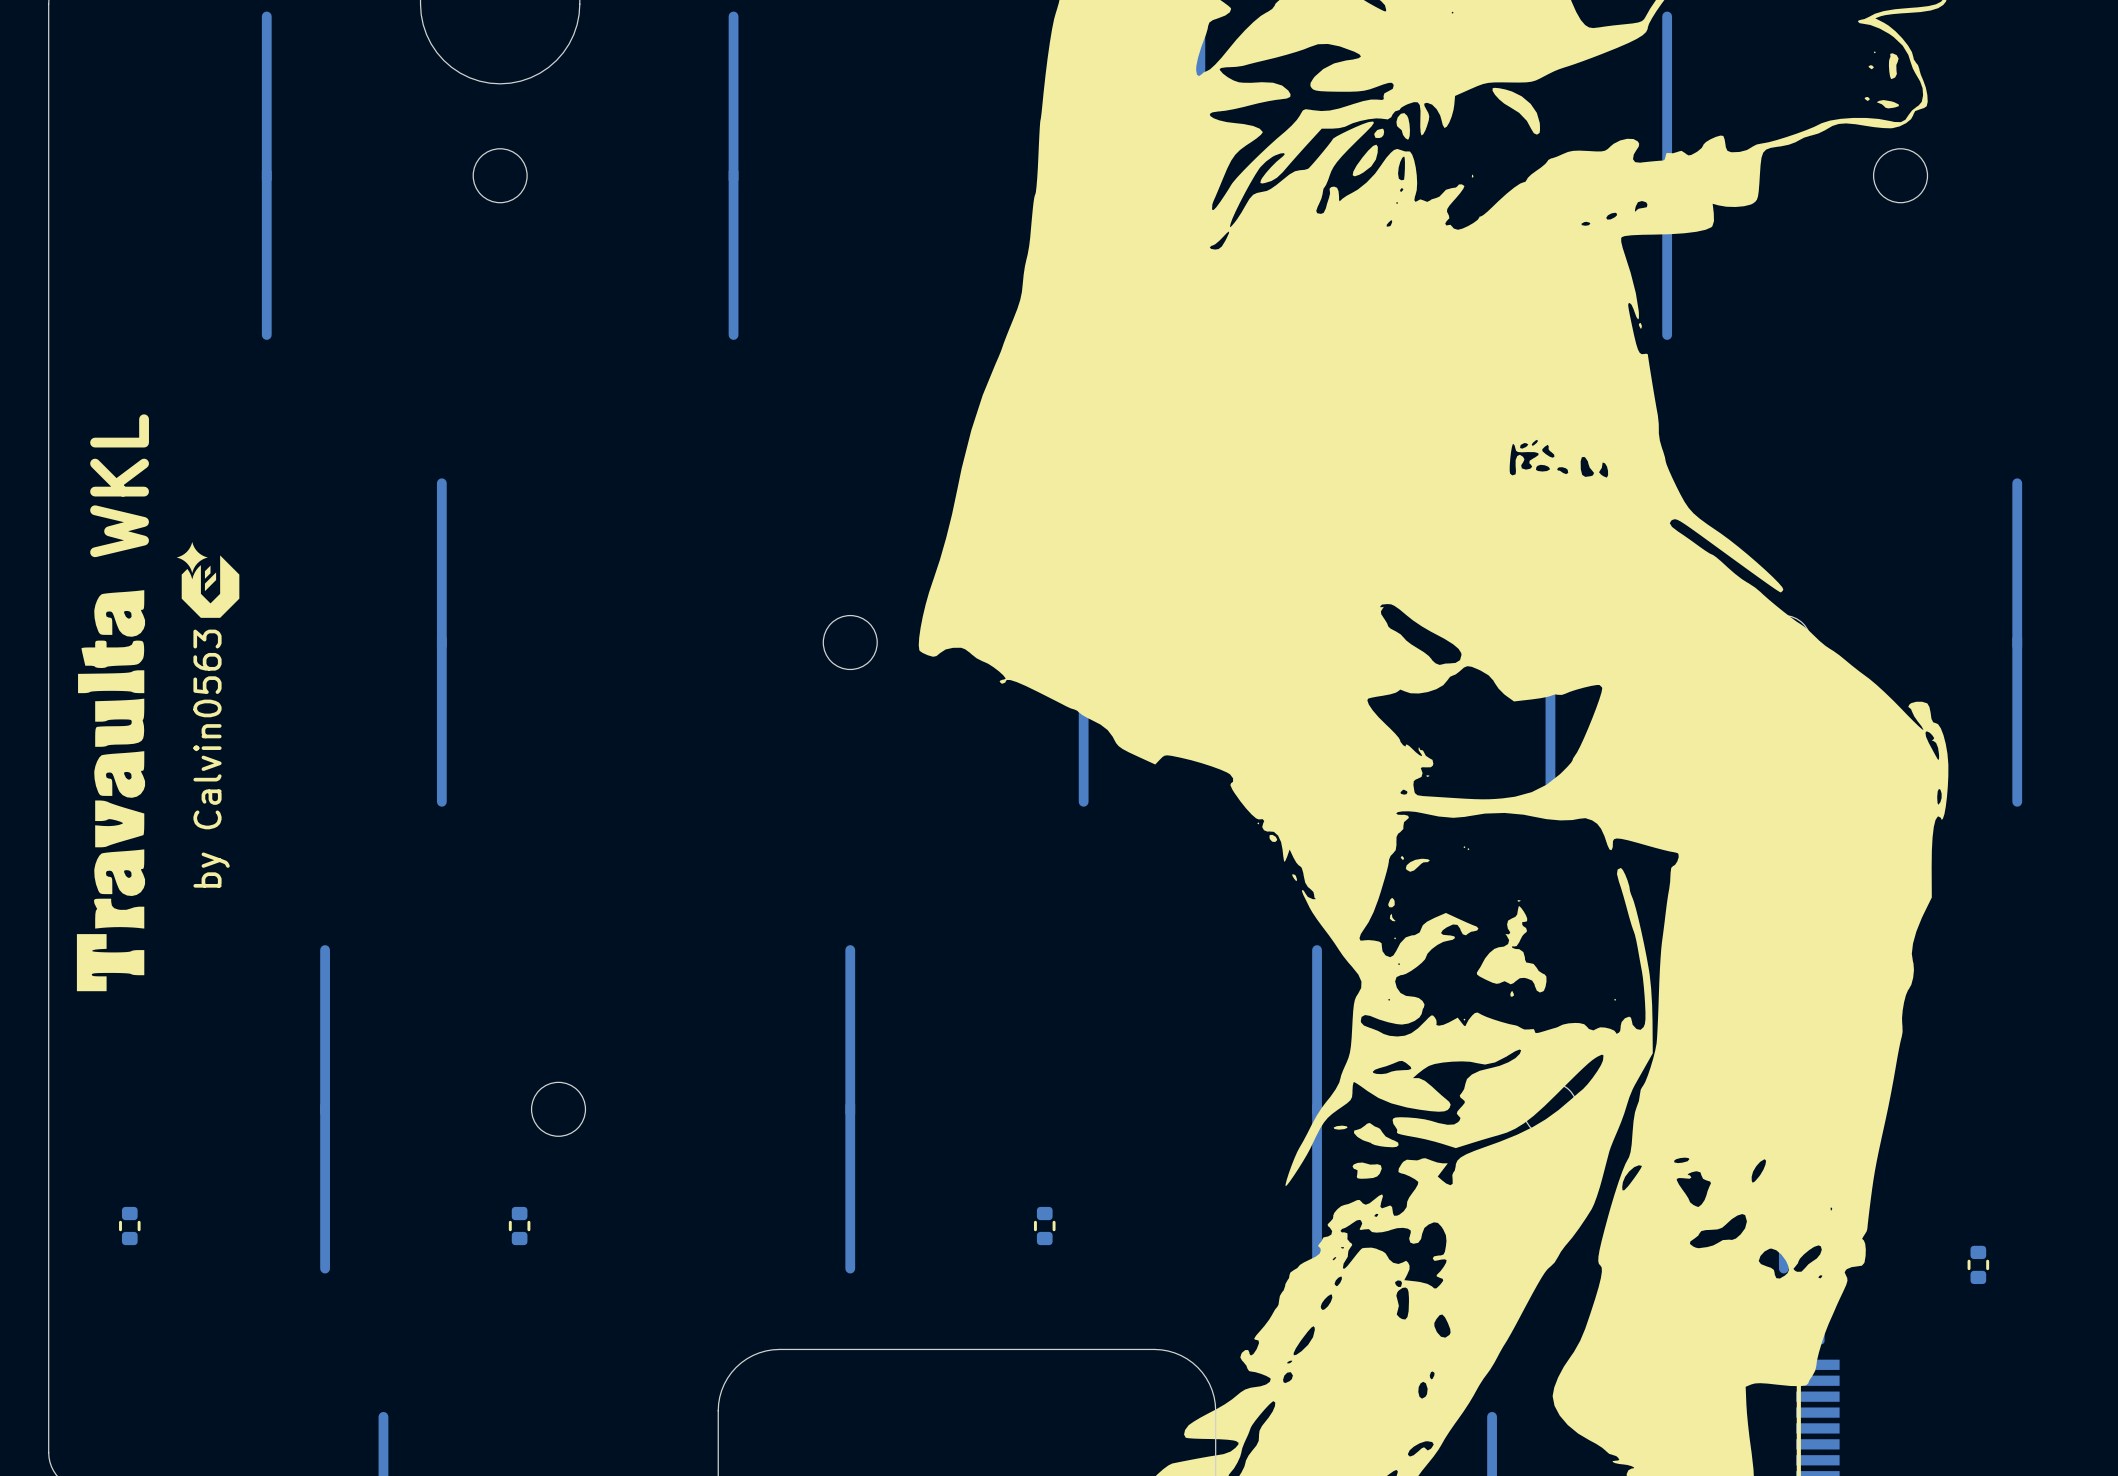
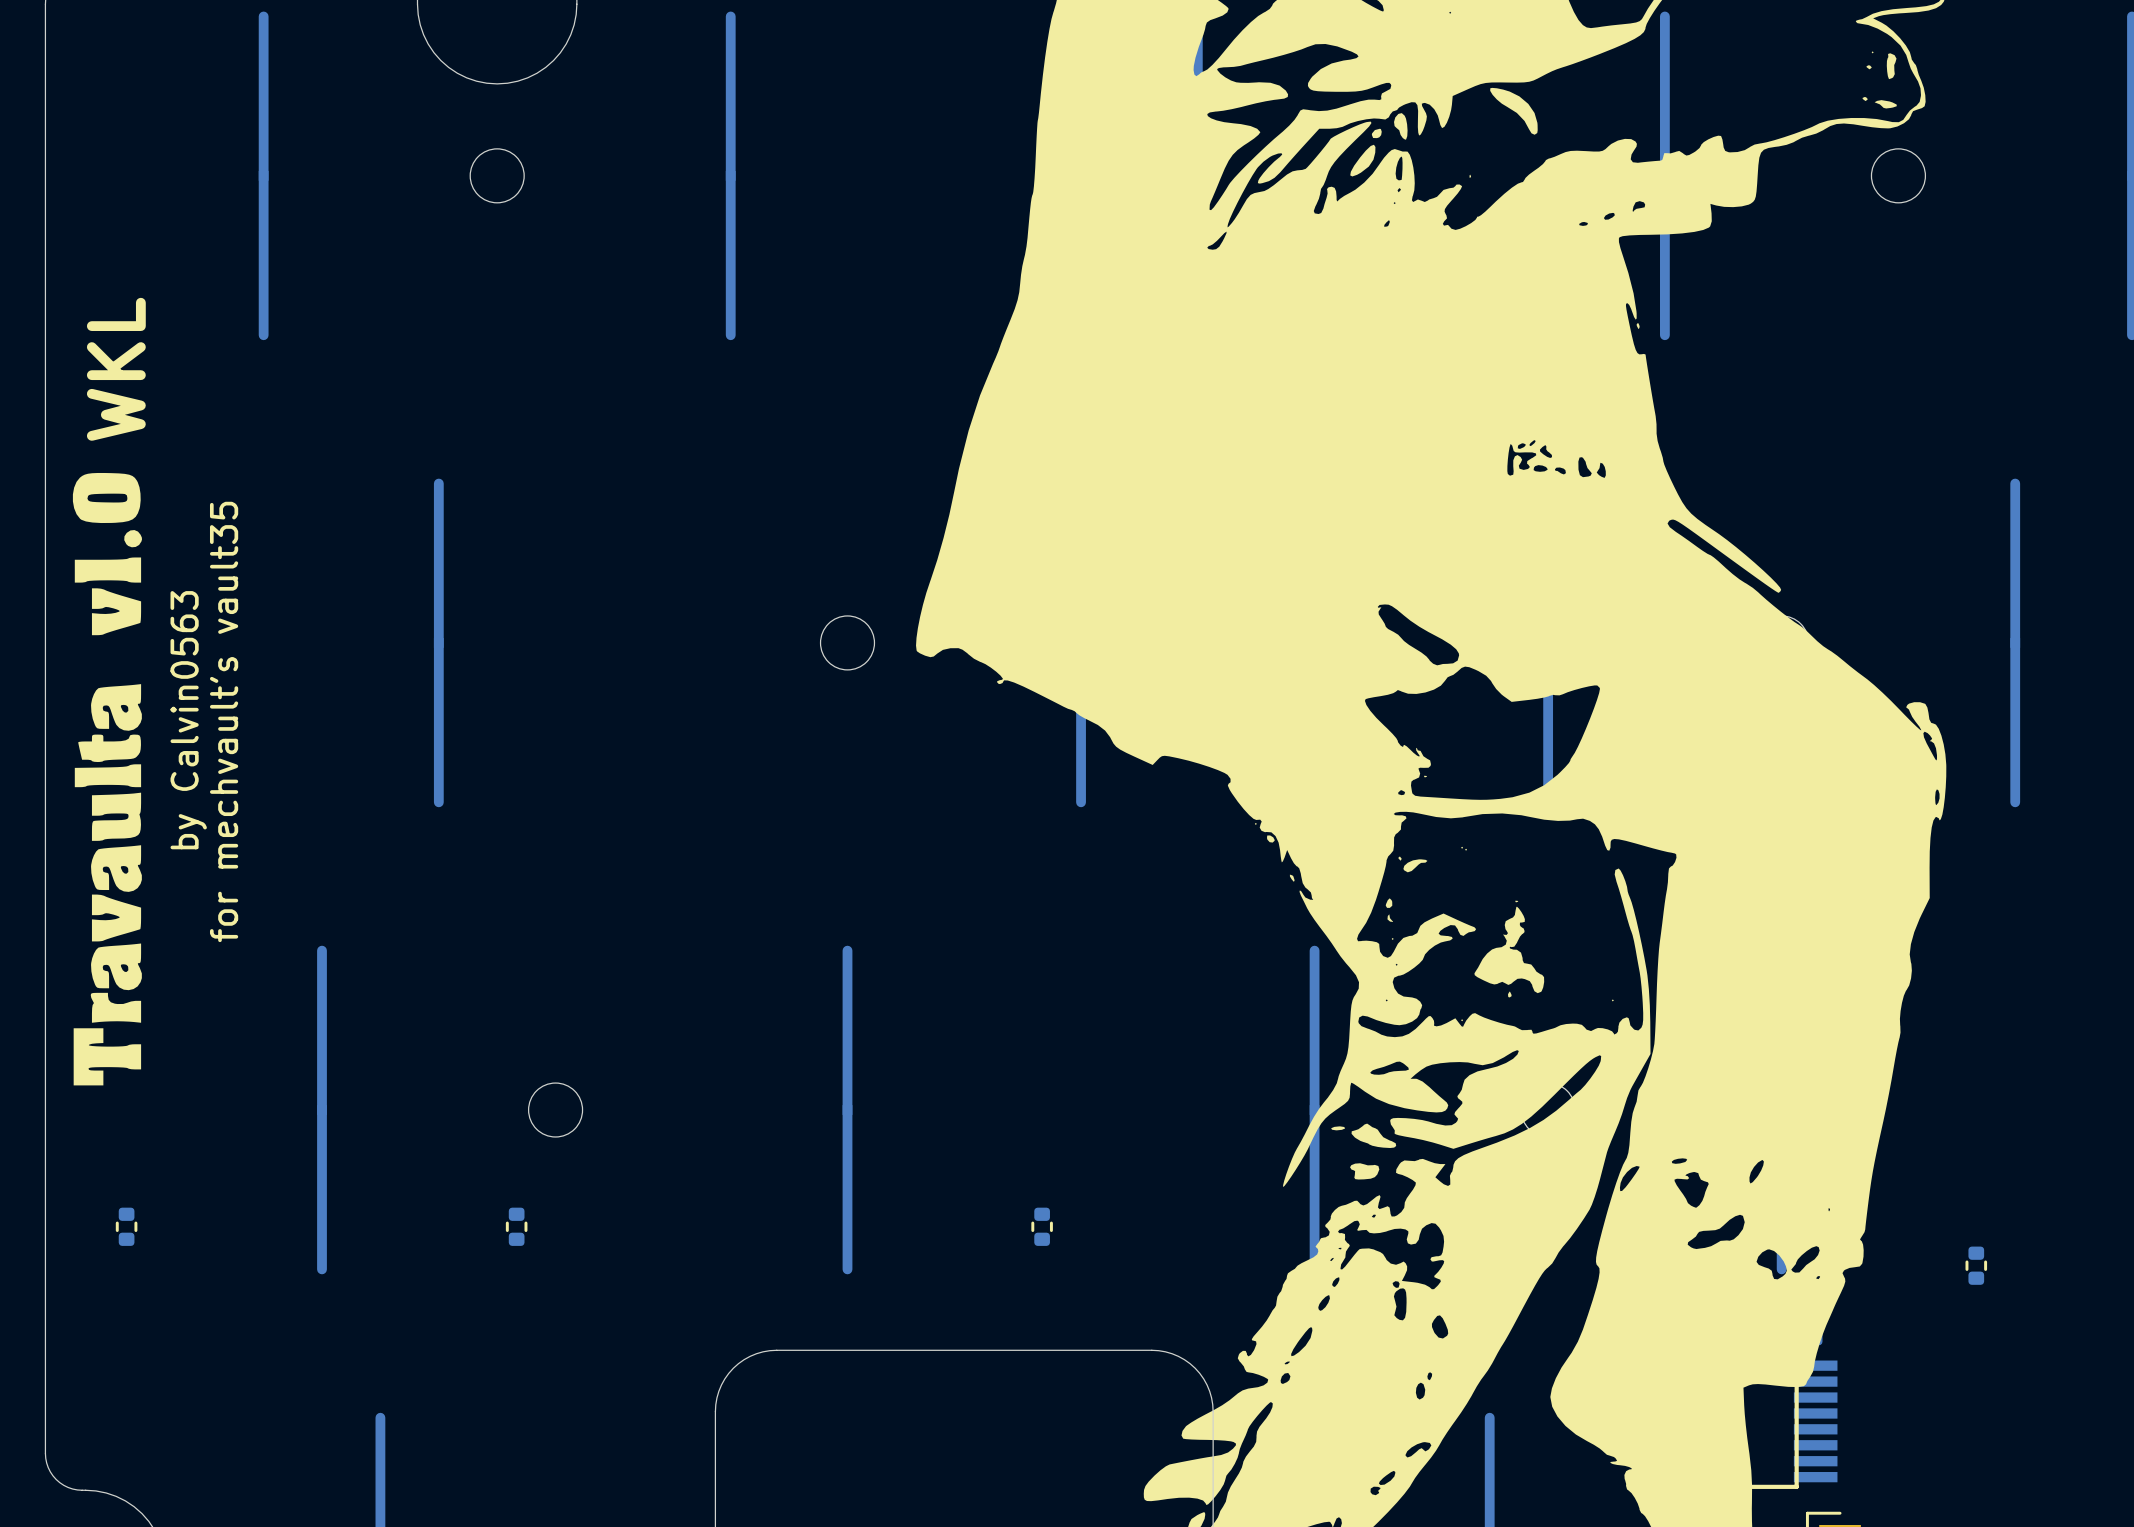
text position: WKL (119, 485) -> WKL (116, 369)
drawing: [176, 541, 240, 618] -> none
drawing shape: [76, 590, 146, 992] -> [72, 472, 143, 1086]
text: none -> for mechvault's vault35 (224, 721)
text position: by Calvin0563 (211, 758) -> by Calvin0563 (188, 720)

